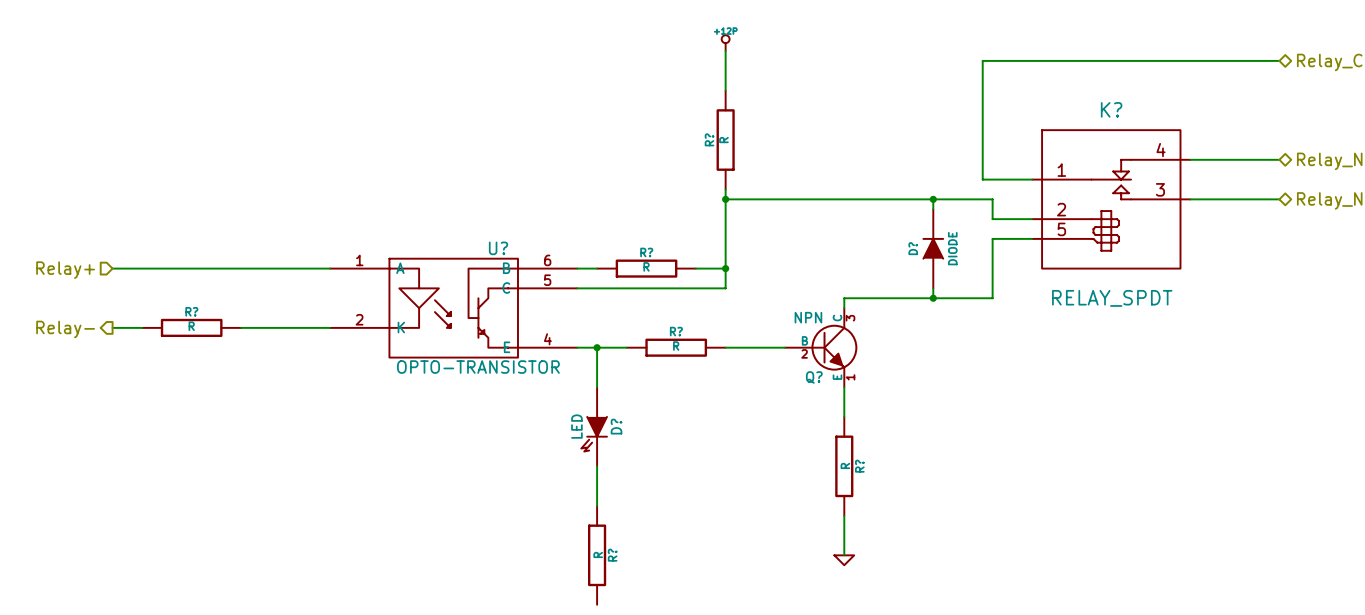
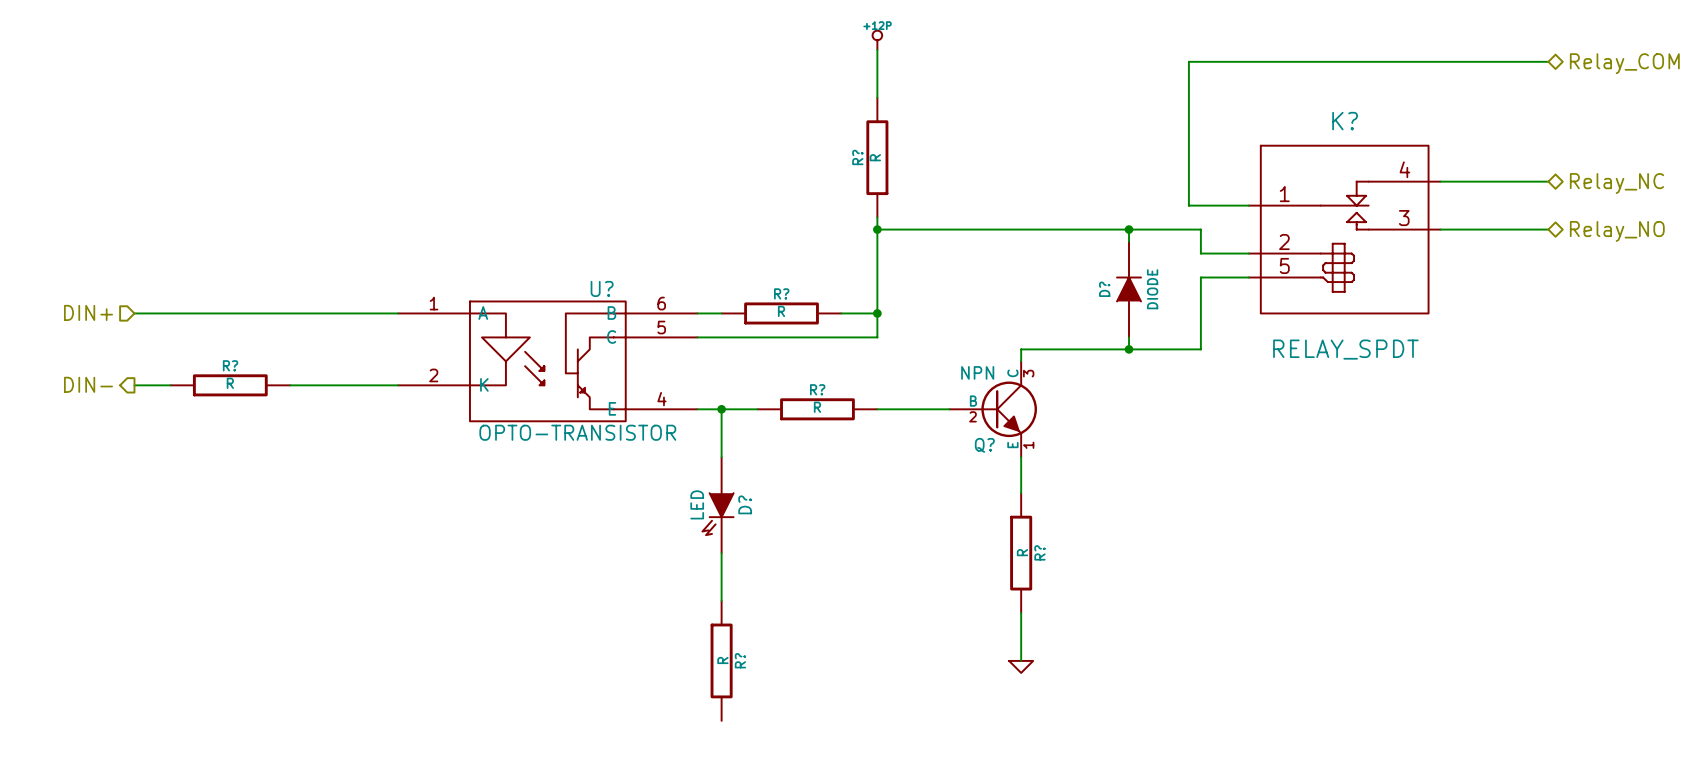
hierarchical label: Relay+ (65, 270) -> DIN+ (88, 312)
hierarchical label: Relay- (65, 329) -> DIN- (88, 384)

